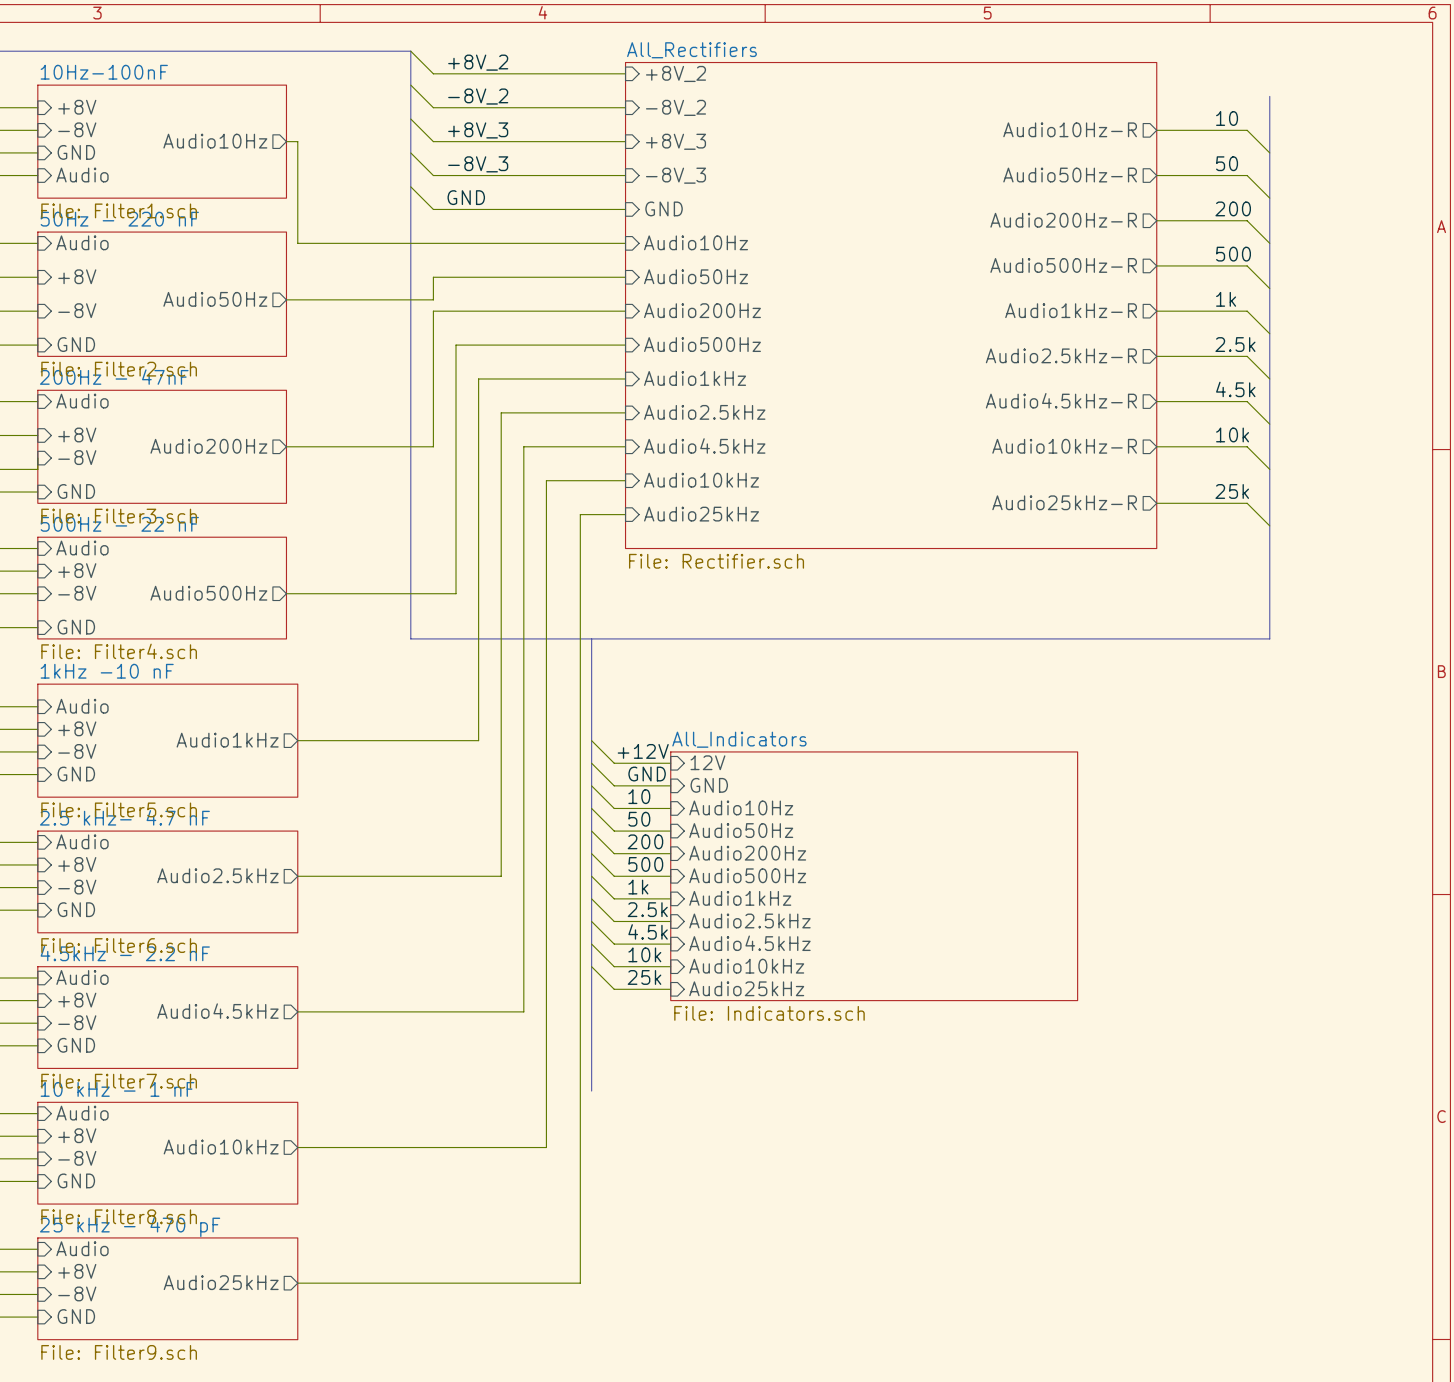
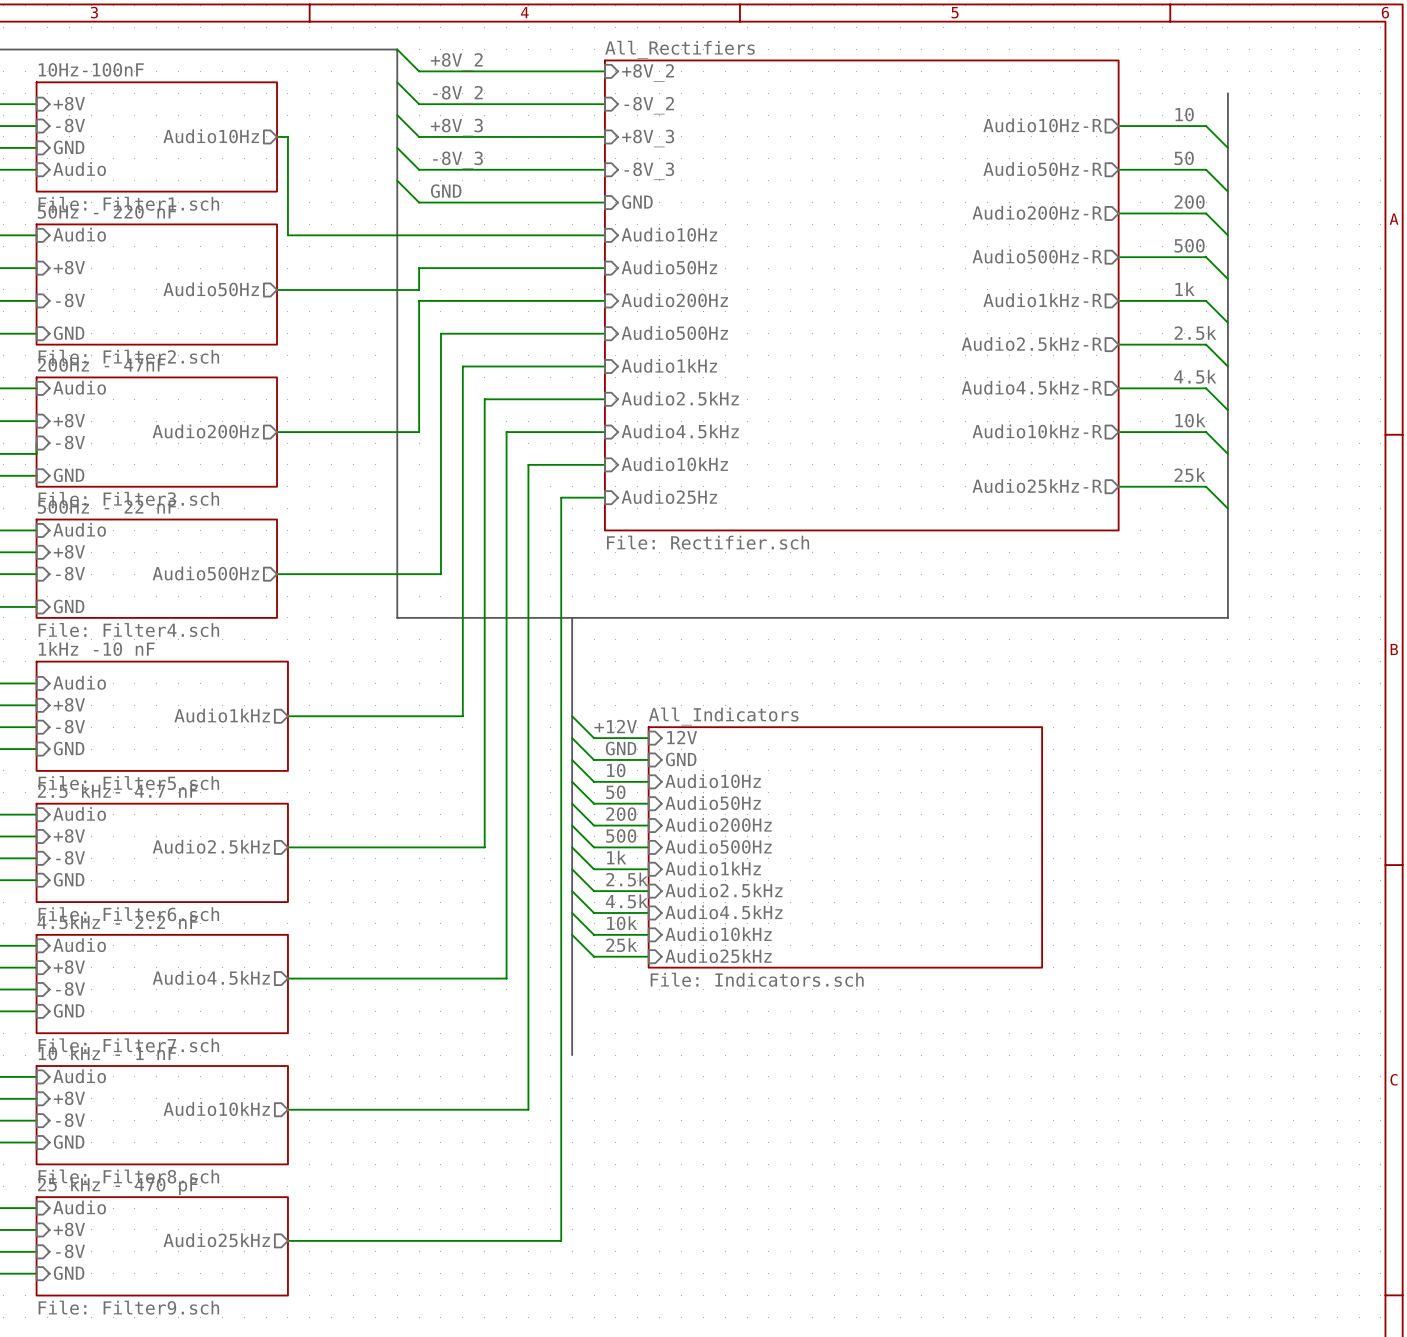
sheet pin: Audio25kHz (701, 514) -> Audio25Hz (669, 497)

